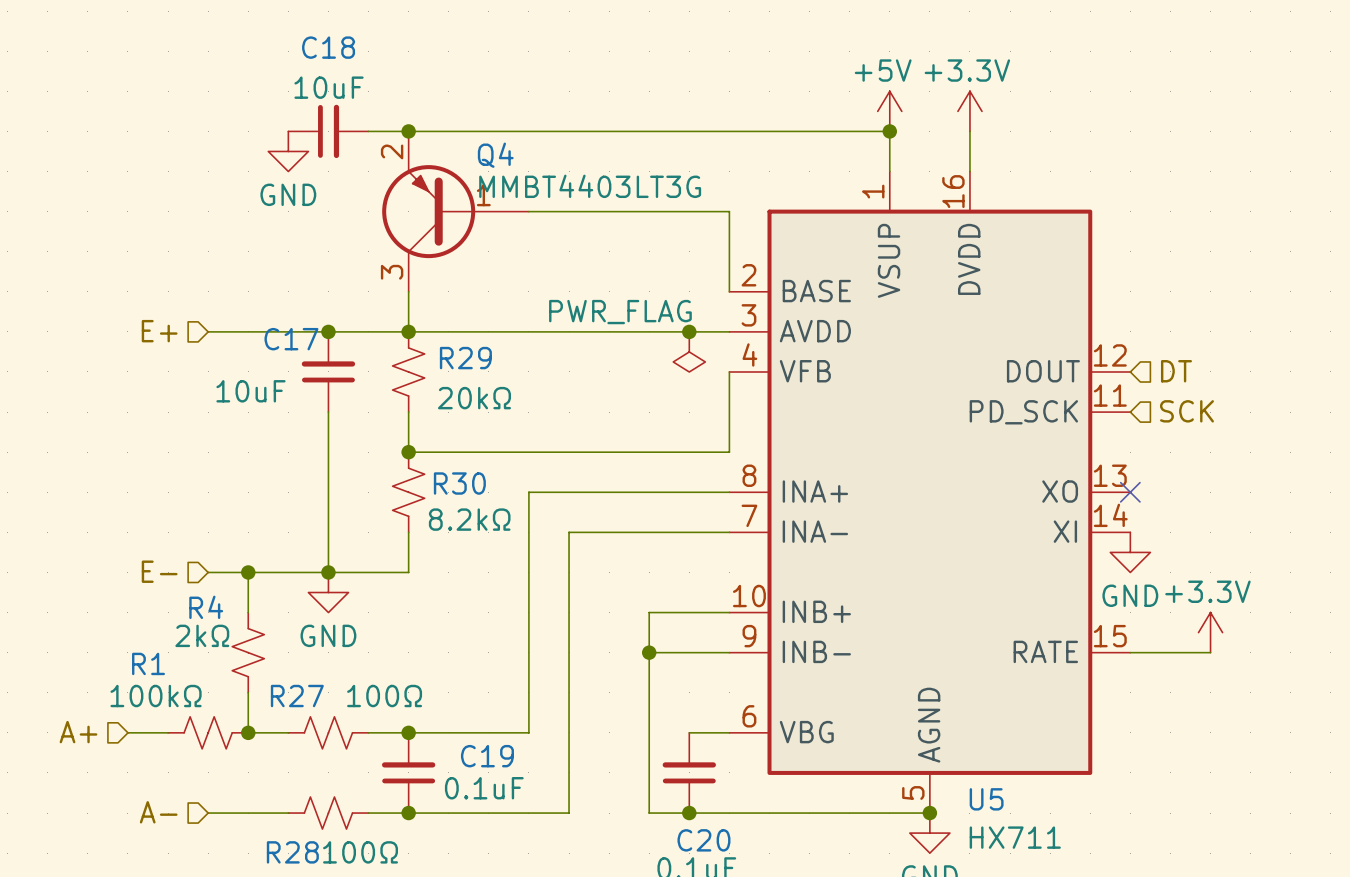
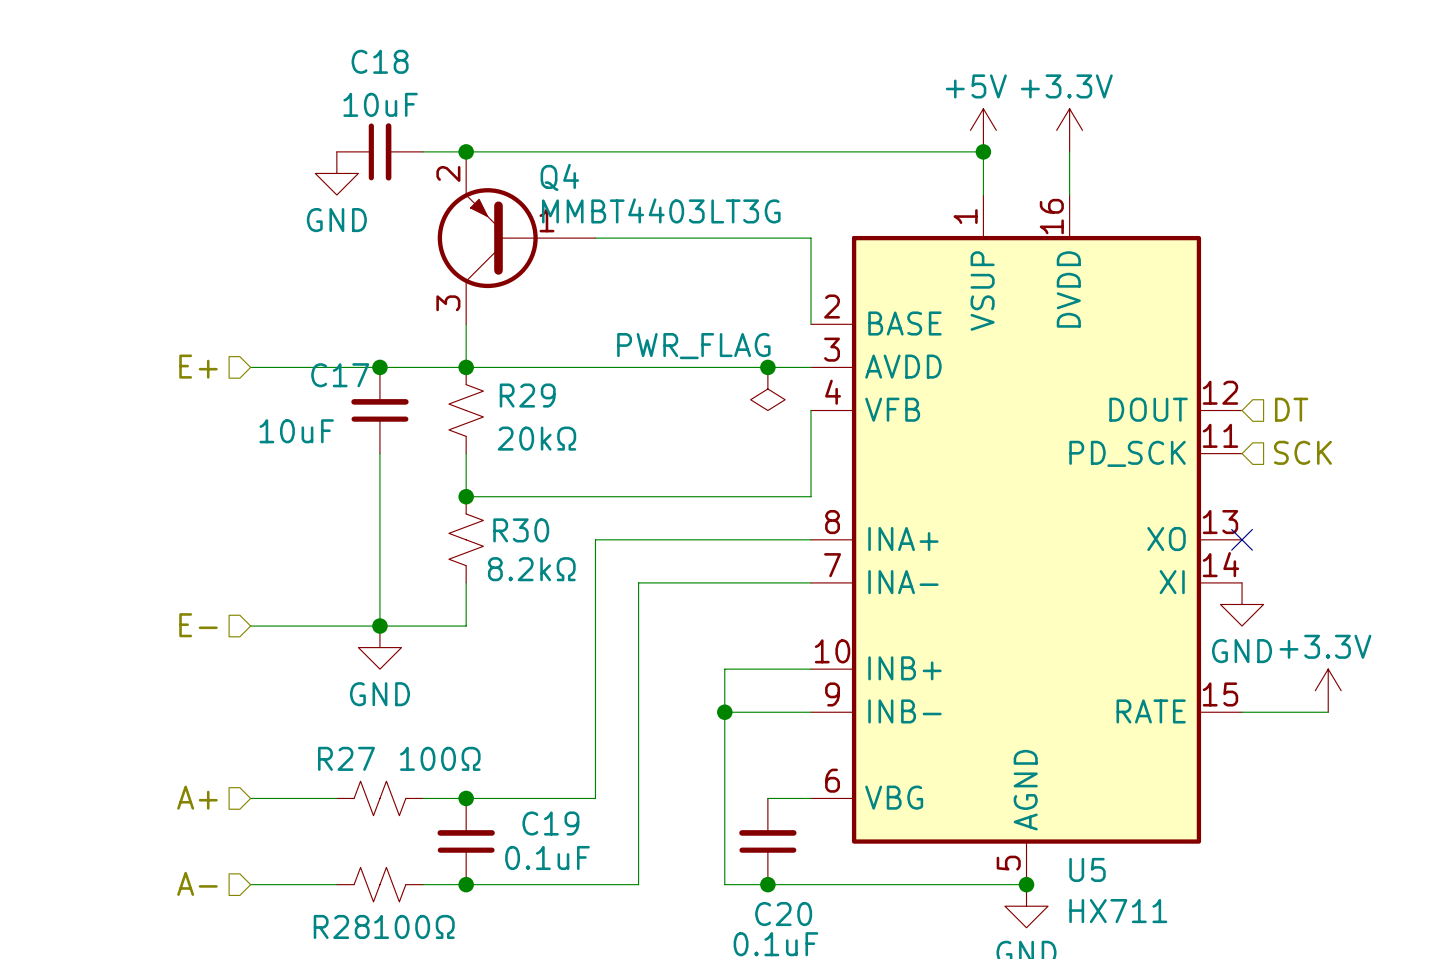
wire: (248, 572) (248, 612) -> none
junction: (248, 572) -> none
R4: 2kΩ (248, 652) -> none
wire: (248, 692) (248, 732) -> (250, 798) (293, 798)
hierarchical label position: A+ (78, 732) -> A+ (197, 797)
wire: (127, 732) (168, 732) -> none
R1: 100kΩ (208, 732) -> none
junction: (248, 732) -> none

